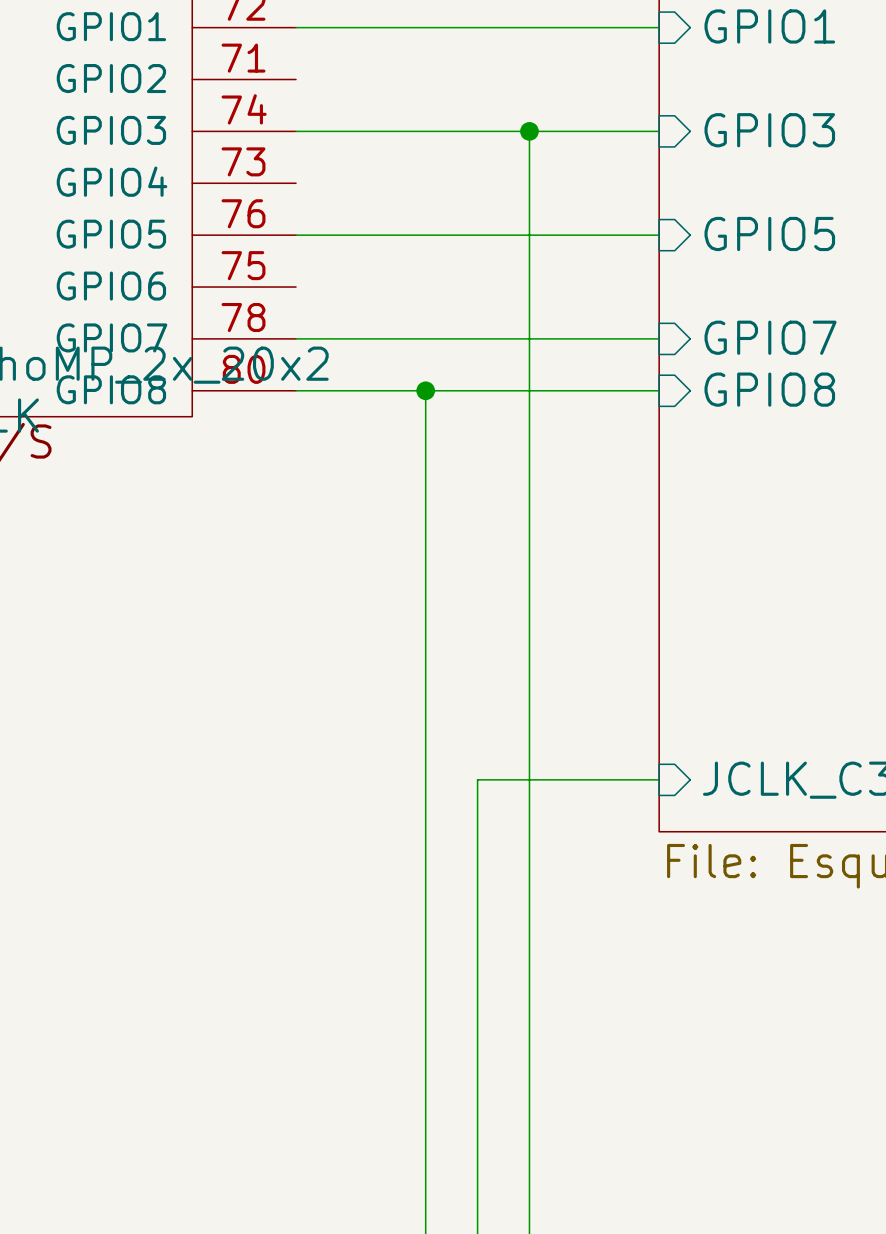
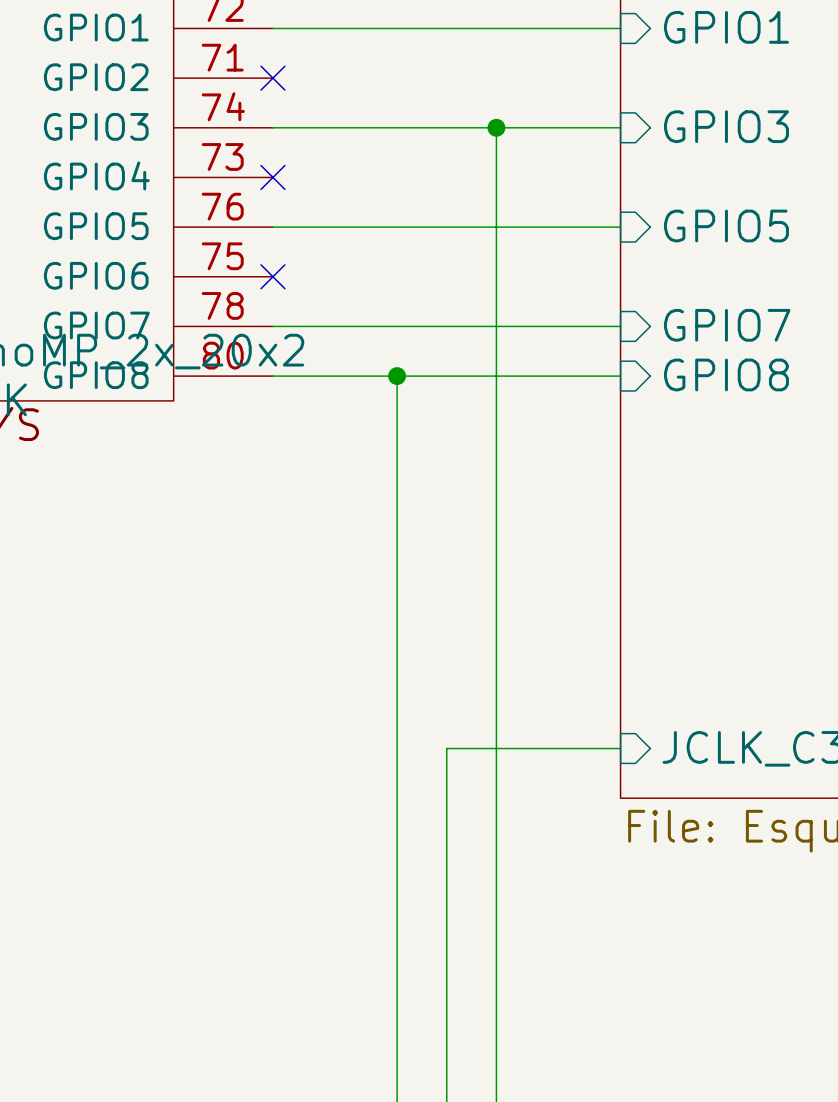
no-connect mark: none -> (272, 78)
no-connect mark: none -> (272, 177)
no-connect mark: none -> (272, 276)

